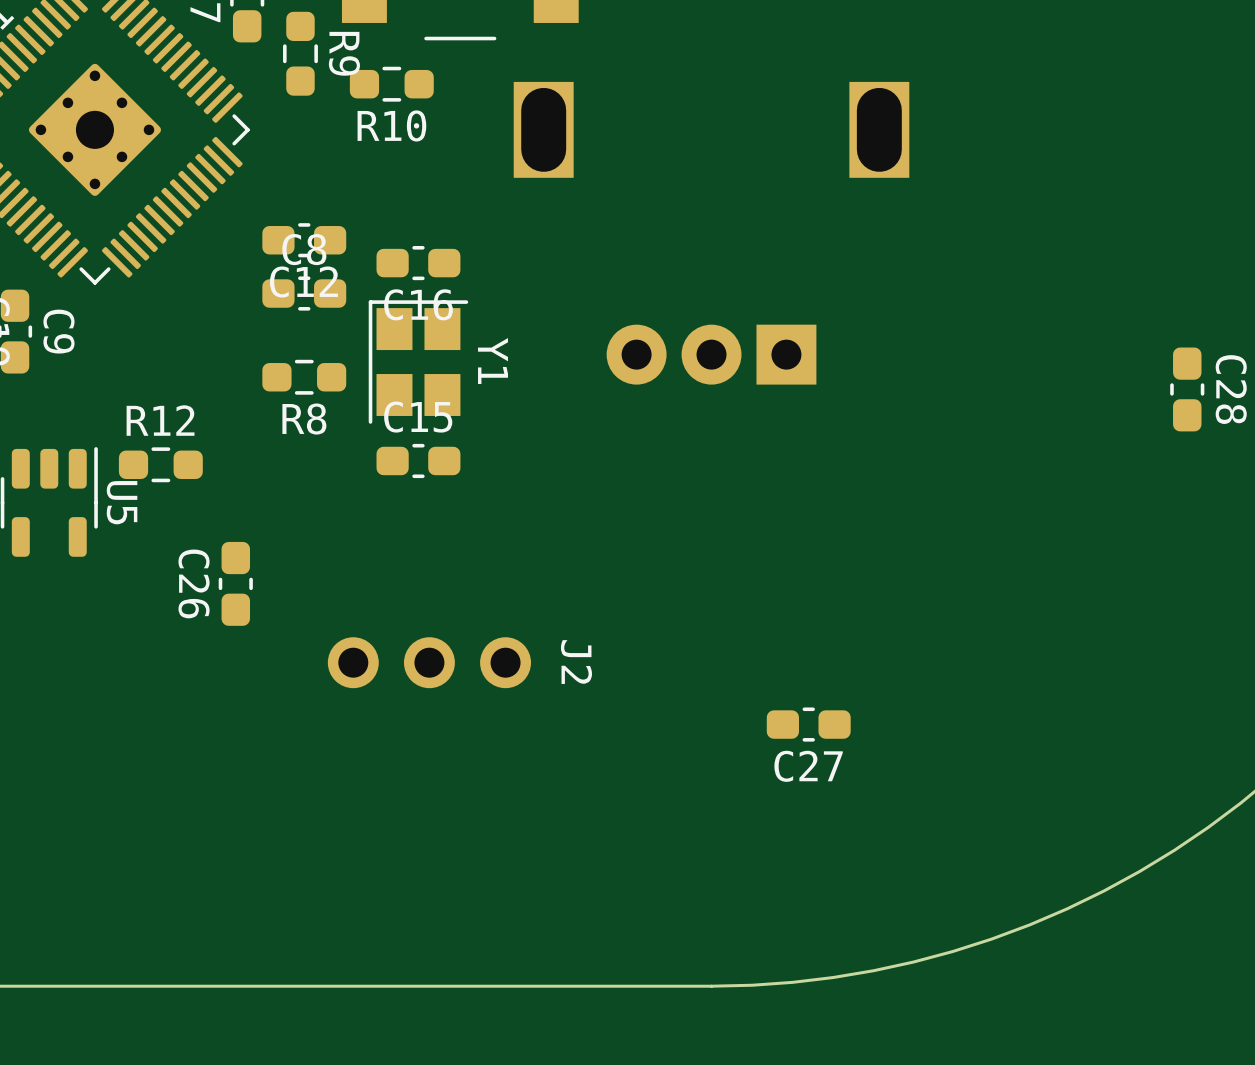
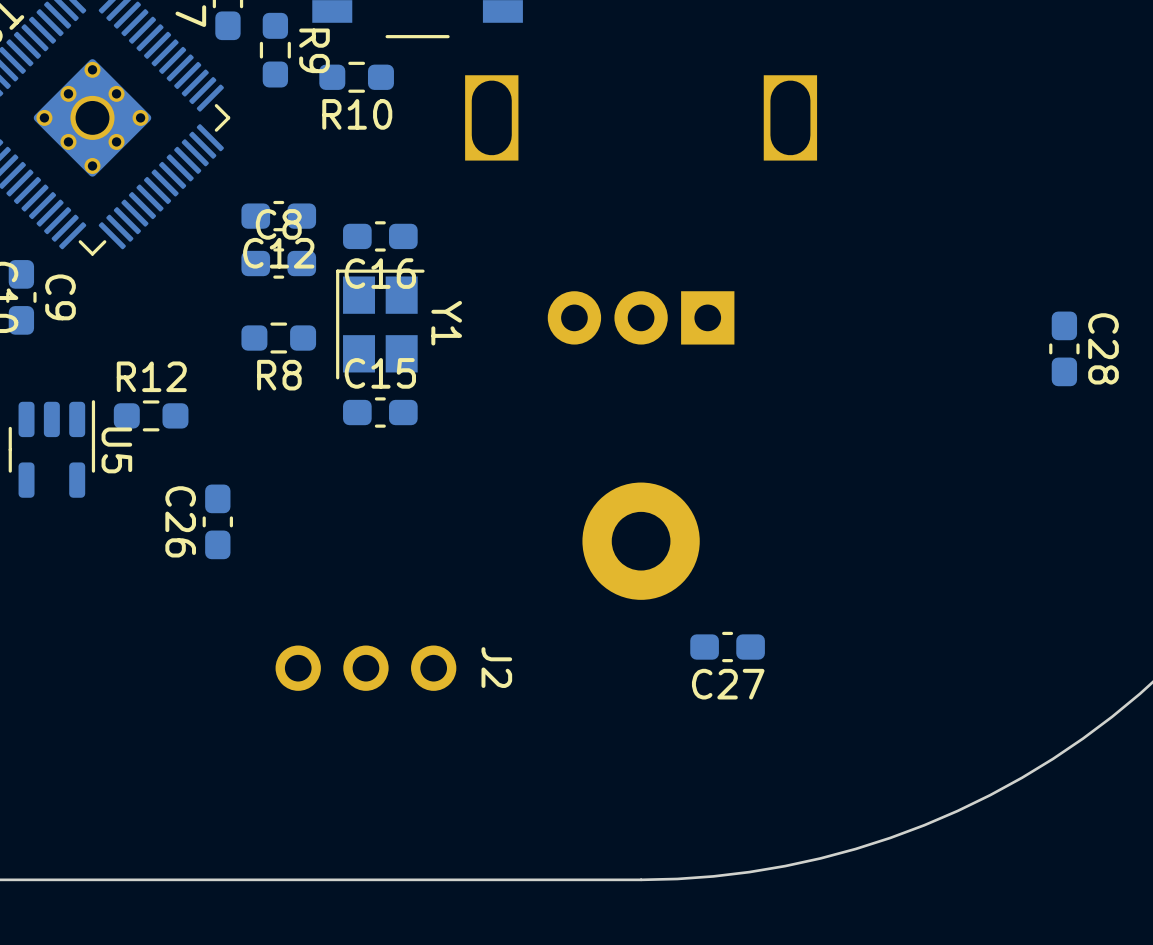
part: none -> (641, 541)
J2 position: (429, 662) -> (365, 668)

